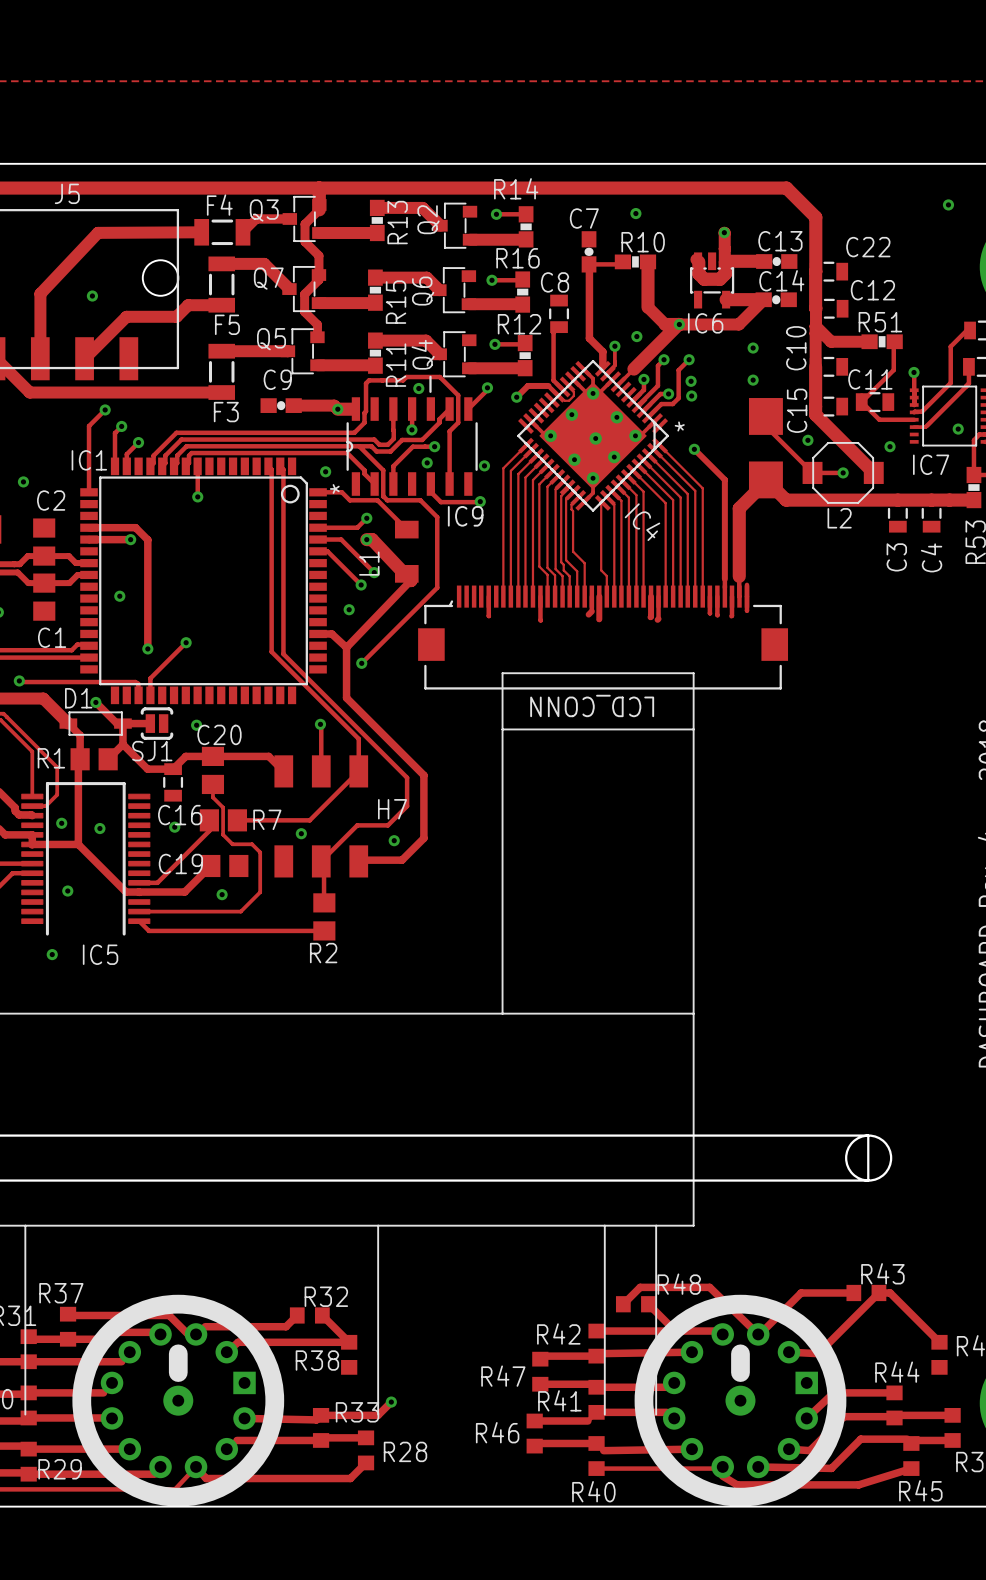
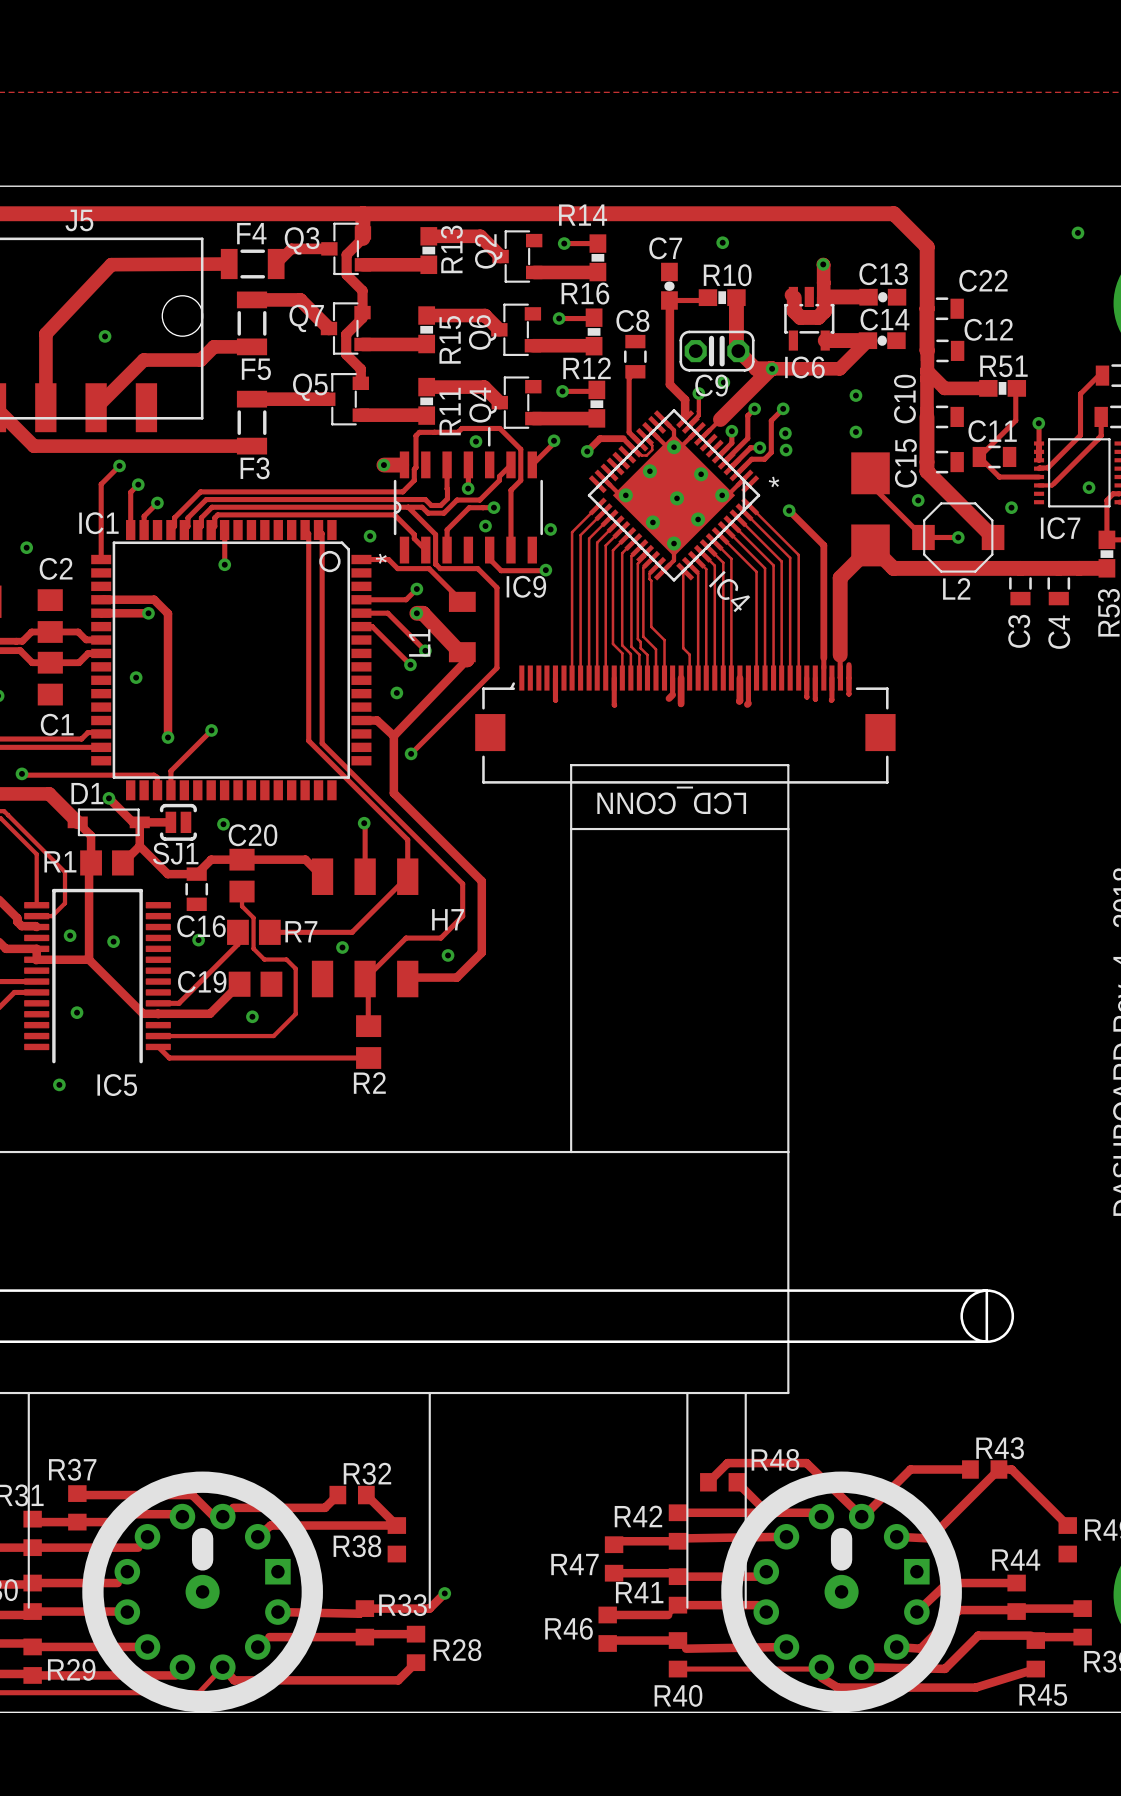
C9 name position: C9 (277, 379) -> C9 (711, 385)
C9 footprint: [260, 398, 302, 413] -> [679, 330, 755, 372]
track: (293, 405) (334, 405) (337, 409) -> none

